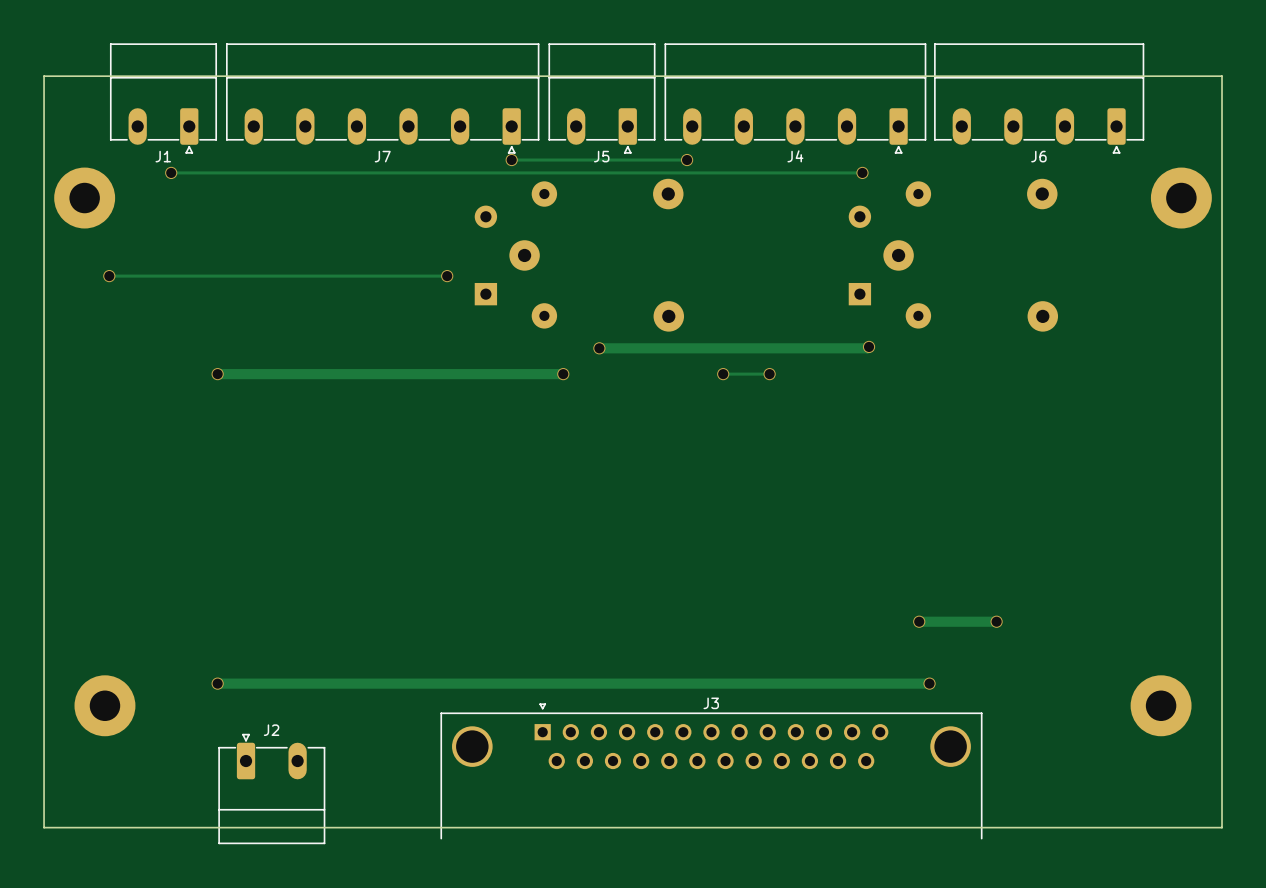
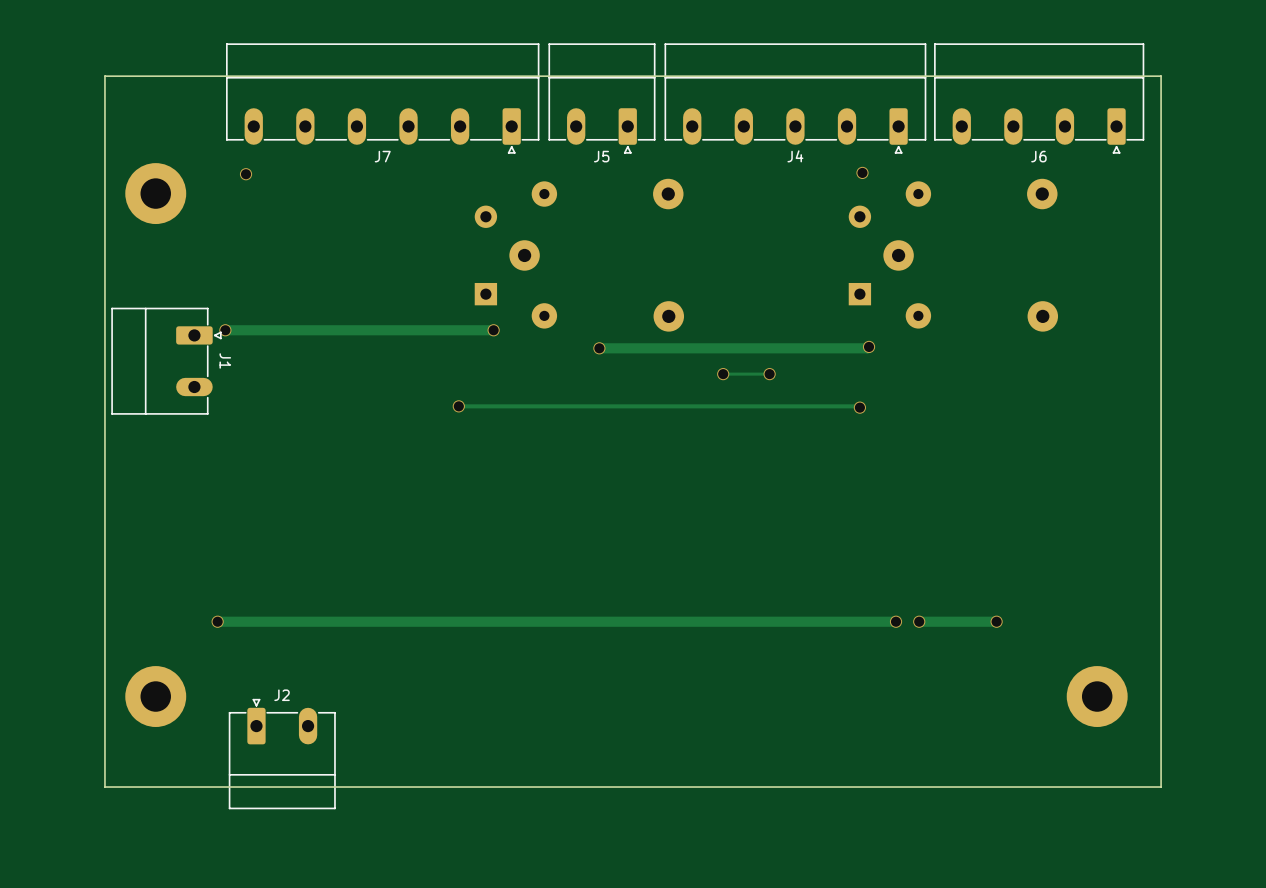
board edge: (1161, 76) (1222, 76) (1222, 827) (44, 827) (44, 76) (104, 76) -> (1161, 76) (1161, 787) (104, 787) (104, 76)
J1 rotation: 0° (163, 98) -> 90° counterclockwise (166, 361)
J1 position: (163, 98) -> (166, 361)
via: (511, 160) -> none
track: (687, 160) (511, 160) -> none
via: (687, 160) -> none
via: (171, 172) -> none
track: (862, 172) (171, 172) -> none
via: none -> (246, 174)
part position: (84, 198) -> (155, 193)
part: (1181, 198) -> none
via: (109, 276) -> none
track: (447, 276) (109, 276) -> none
via: (447, 276) -> none
track: none -> (493, 330) (225, 330)
via: none -> (493, 330)
via position: (217, 374) -> (225, 330)
track: (563, 374) (217, 374) -> none
via: (563, 374) -> none
track: none -> (458, 406) (859, 407)
via: none -> (458, 406)
via: none -> (859, 407)
via: none -> (217, 621)
track: none -> (896, 621) (217, 621)
via: none -> (896, 621)
via: (217, 683) -> none
track: (929, 683) (217, 683) -> none
via: (929, 683) -> none
part position: (104, 705) -> (155, 696)
part position: (1161, 705) -> (1097, 696)
J3: (711, 771) -> none
J2 position: (271, 788) -> (282, 754)

